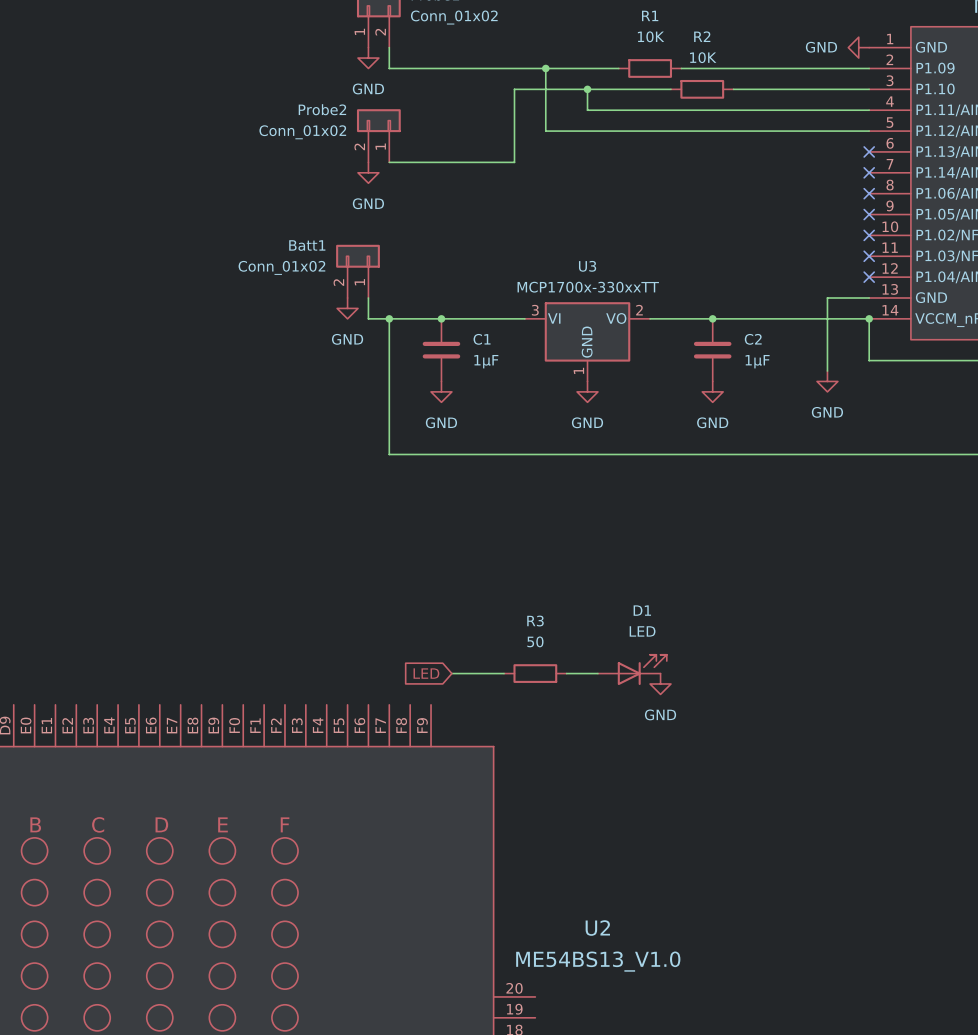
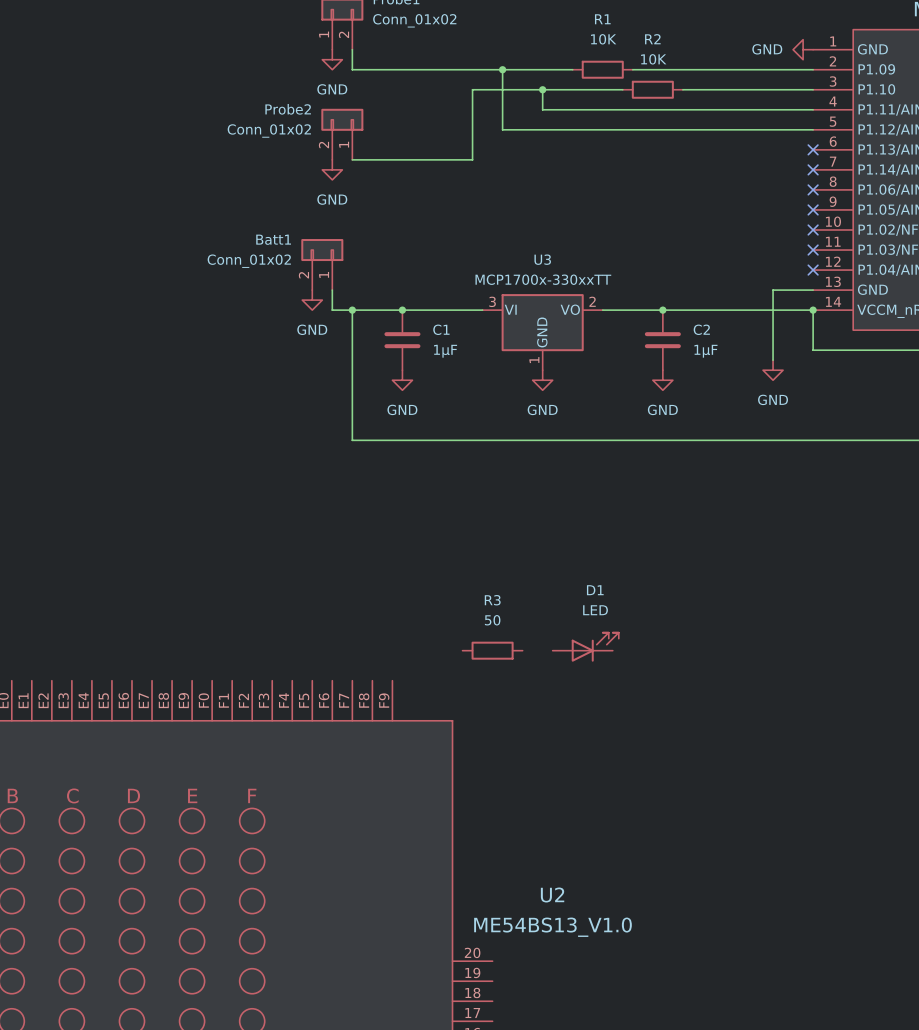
global label: LED (426, 673) -> none
wire: (451, 673) (504, 673) -> none
wire: (566, 673) (597, 673) -> none
power symbol: GND (660, 683) -> none

